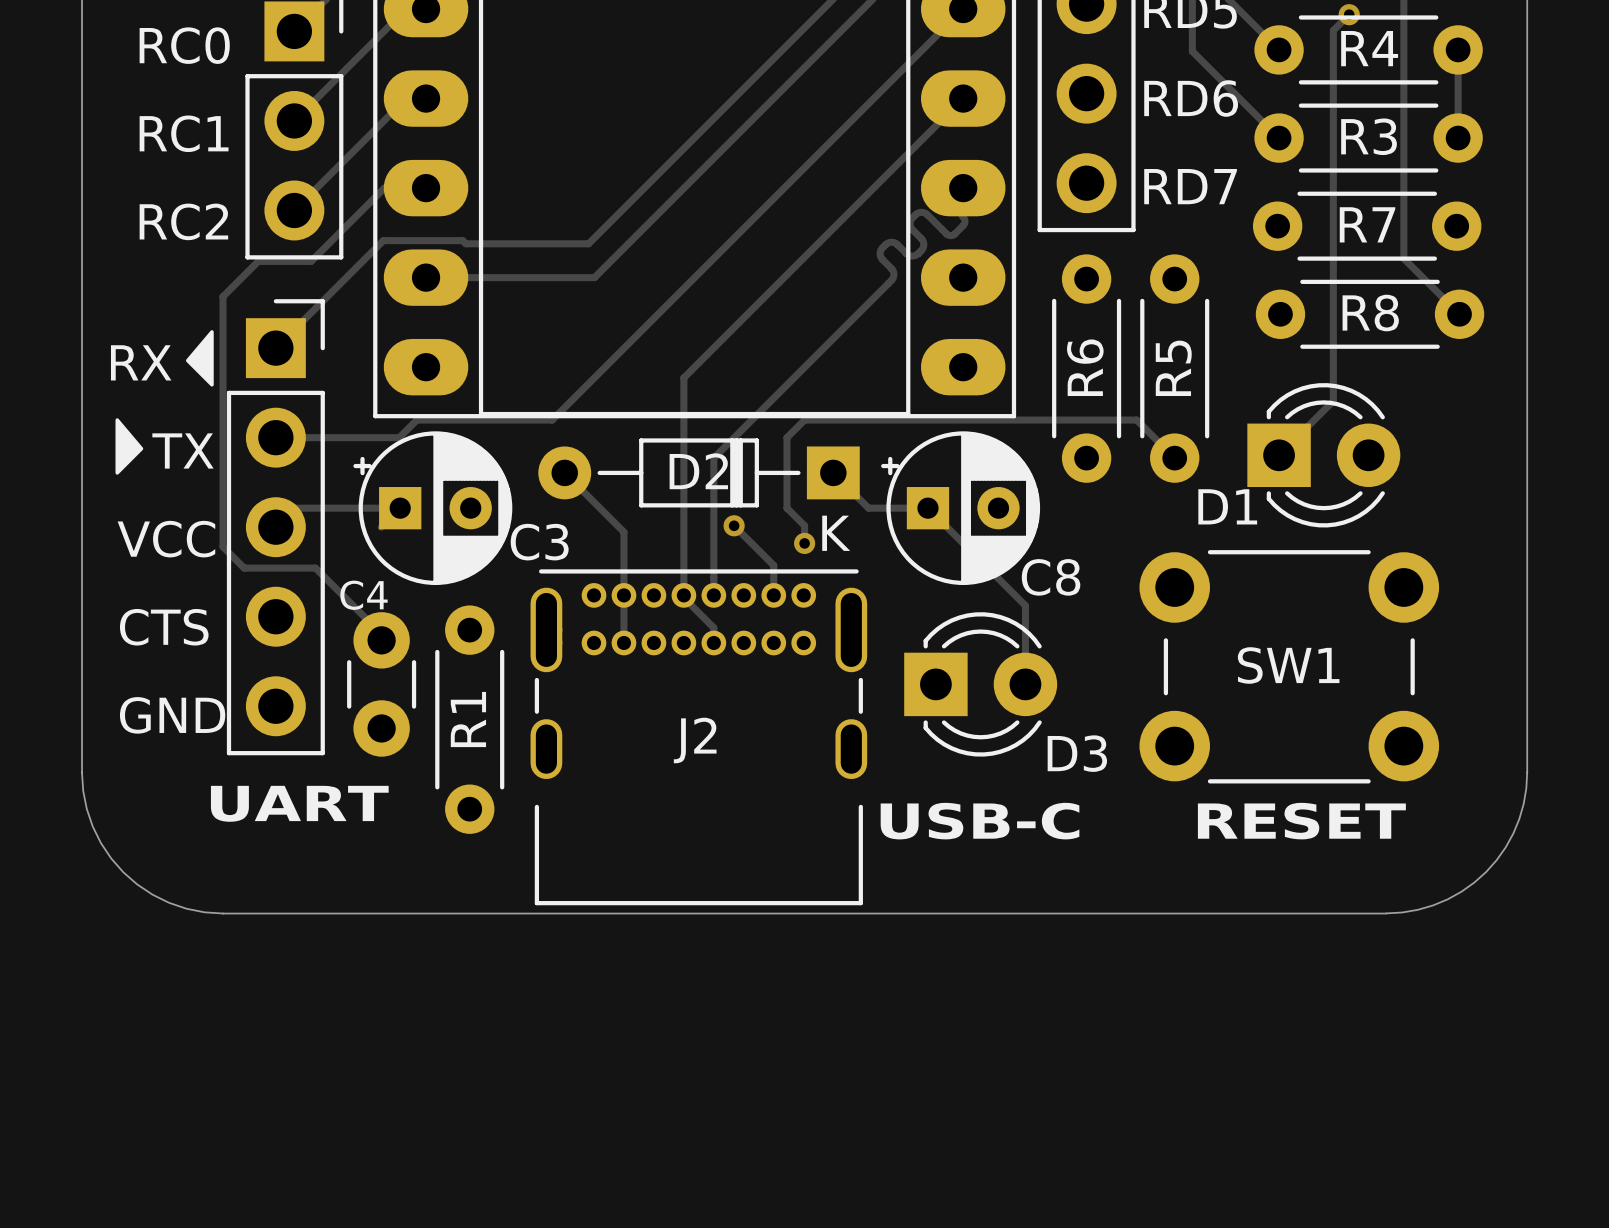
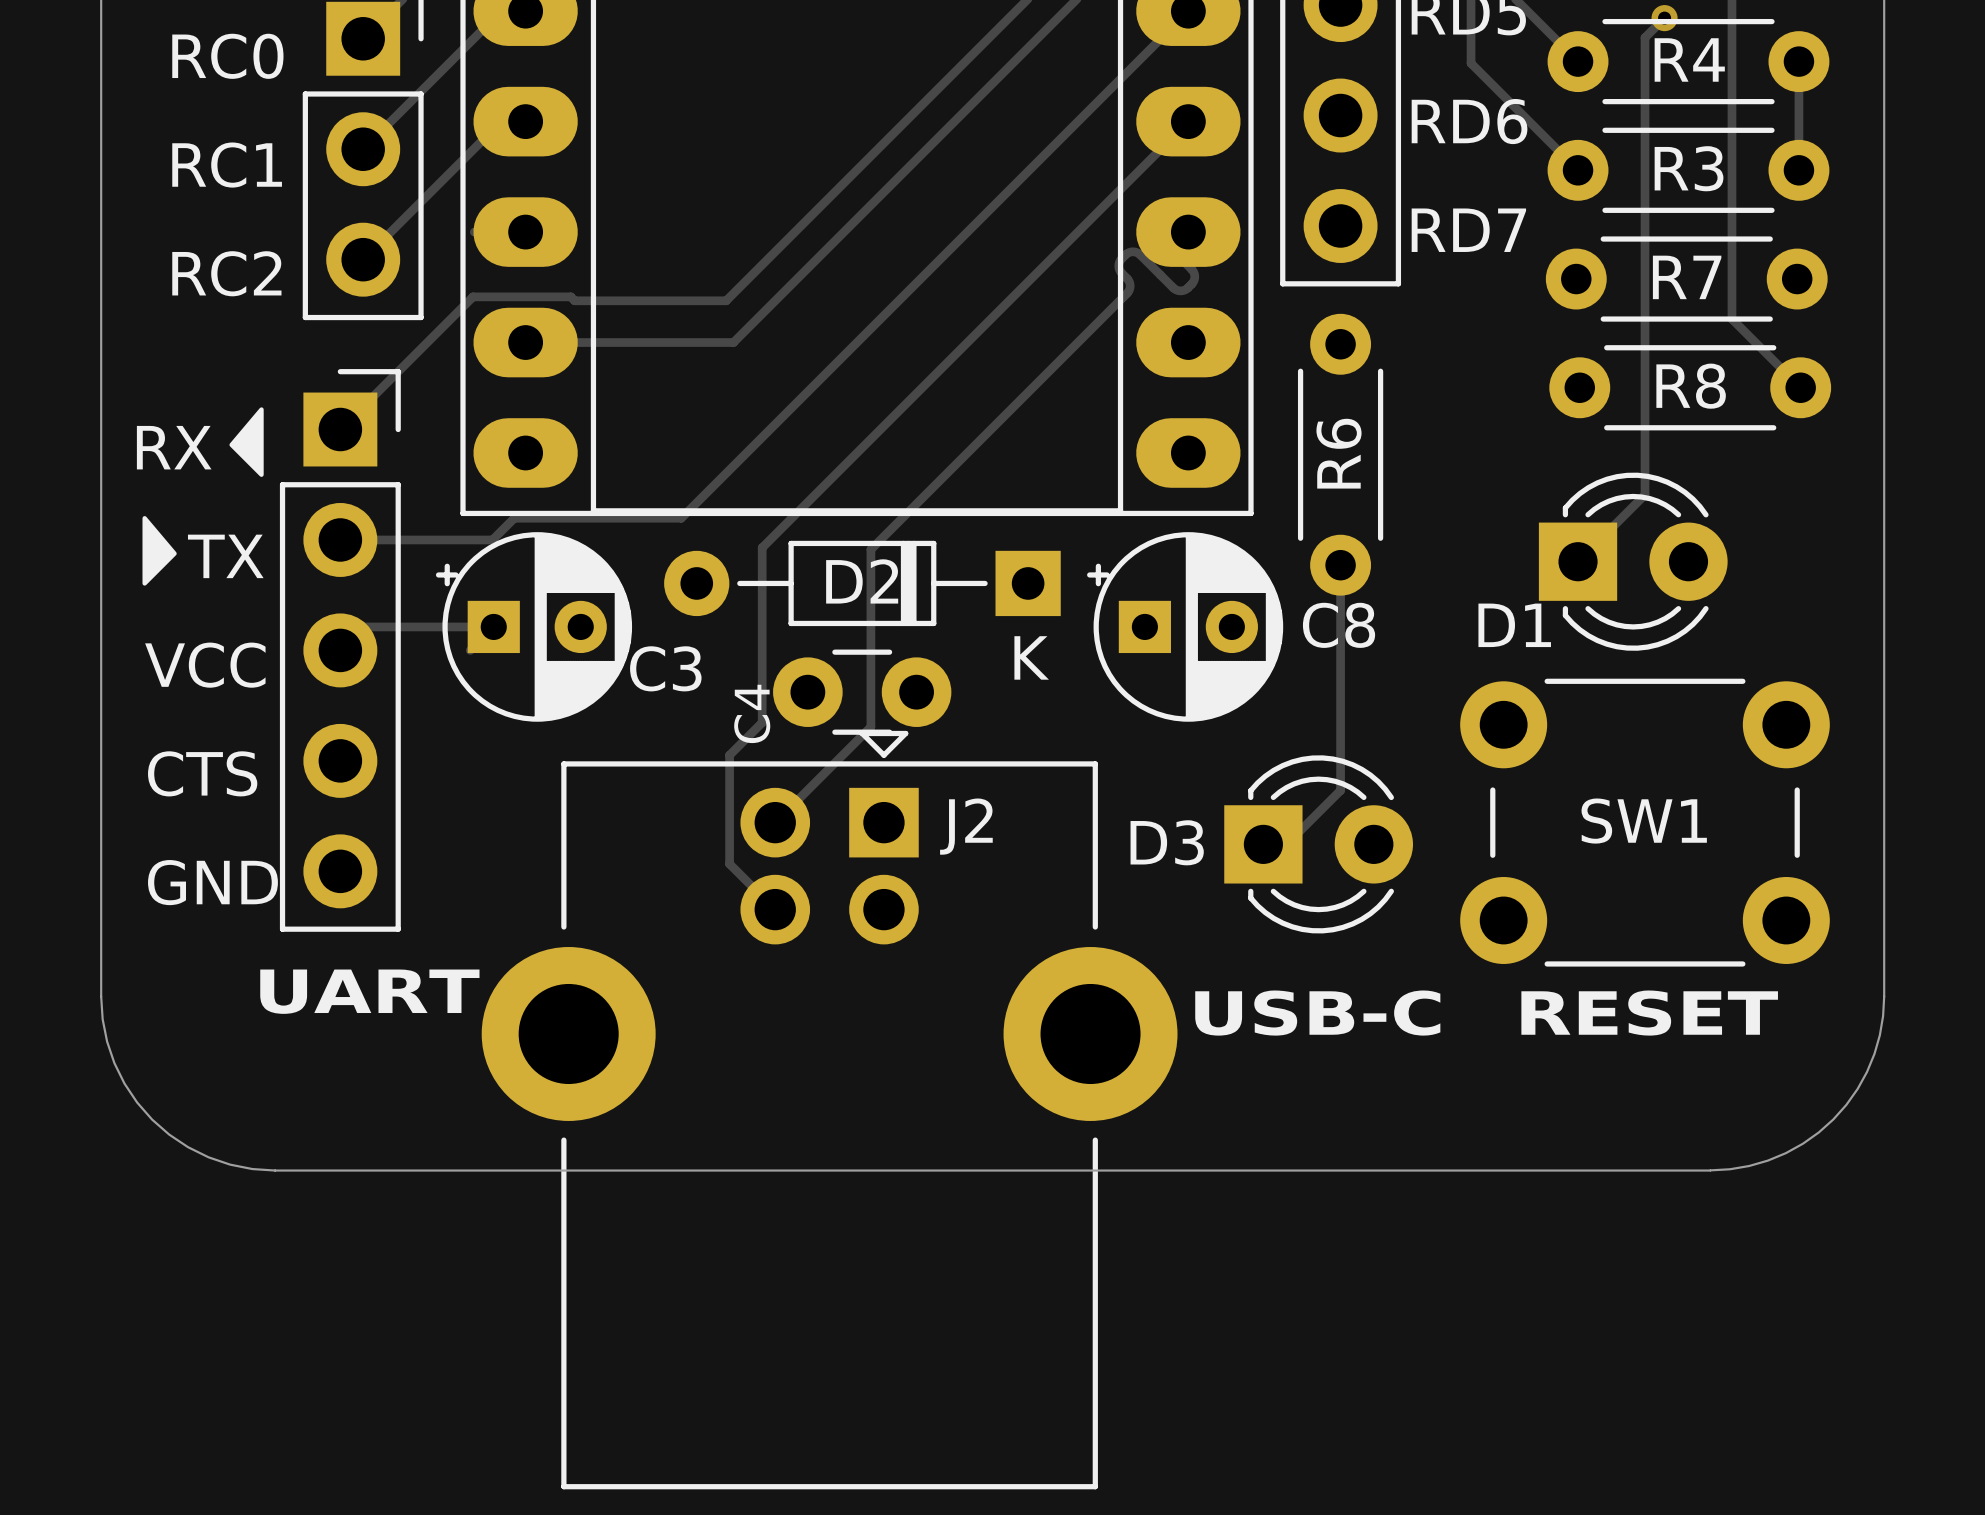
track: (384, 188) (311, 261) (258, 261) (223, 296) (223, 546) (244, 568) (315, 568) (378, 631) (381, 631) (381, 640) -> none
track: none -> (1188, 232) (1178, 242) (1175, 249) (1178, 255) (1194, 273) (1193, 281) (1188, 287) (1181, 290) (1176, 289) (1139, 254) (1132, 251) (1126, 254) (1120, 260) (1118, 265) (1120, 271) (1129, 281) (1128, 292) (870, 549) (870, 726) (775, 822)
track: (963, 208) (961, 213) (964, 223) (951, 235) (947, 234) (925, 213) (918, 212) (912, 217) (910, 226) (922, 240) (922, 249) (912, 256) (907, 254) (893, 242) (887, 243) (882, 247) (880, 256) (892, 270) (892, 279) (713, 458) (713, 595) -> none
R5: (1174, 368) -> none
track: (683, 377) (683, 597) (713, 627) (713, 642) -> (843, 466) (762, 547) (762, 722) (729, 755) (729, 863) (775, 909)
track: none -> (1340, 565) (1340, 790) (1275, 856)
track: (1174, 458) (1136, 420) (804, 420) (786, 437) (786, 508) (804, 525) (804, 543) -> none
track: (564, 472) (623, 532) (623, 642) -> none
track: (833, 472) (868, 508) (927, 508) (1025, 605) (1025, 684) -> none
track: (734, 525) (773, 565) (773, 595) -> none
via: (734, 525) -> none
via: (804, 543) -> none
J2 footprint: [530, 569, 868, 906] -> [481, 730, 1178, 1490]
C8 name position: C8 (1051, 577) -> C8 (1339, 625)
C4 name position: C4 (364, 595) -> C4 (752, 713)
SW1 position: (1289, 666) -> (1645, 822)
C4 rotation: 0° (381, 684) -> 90° clockwise (862, 692)
C4 position: (381, 684) -> (862, 692)
D3 position: (980, 684) -> (1318, 844)
R1: (469, 719) -> none
J2 name position: J2 (695, 740) -> J2 (966, 826)
D3 name position: D3 (1077, 753) -> D3 (1167, 842)
board edge: (82, 772) (86, 809) (92, 826) (100, 843) (123, 872) (152, 894) (186, 908) (204, 912) (1386, 913) -> (101, 953) (102, 1019) (107, 1041) (114, 1063) (137, 1102) (169, 1134) (188, 1147) (230, 1164) (252, 1169) (1710, 1170)
board edge: (1527, 772) (1523, 803) (1513, 833) (1496, 860) (1486, 872) (1474, 882) (1447, 899) (1417, 909) (1386, 913) -> (1884, 953) (1884, 996) (1879, 1035) (1867, 1071) (1846, 1104) (1818, 1132) (1785, 1153) (1749, 1165) (1710, 1170)
text position: USB-C (980, 821) -> USB-C (1317, 1013)
text position: RESET (1301, 821) -> RESET (1649, 1013)

